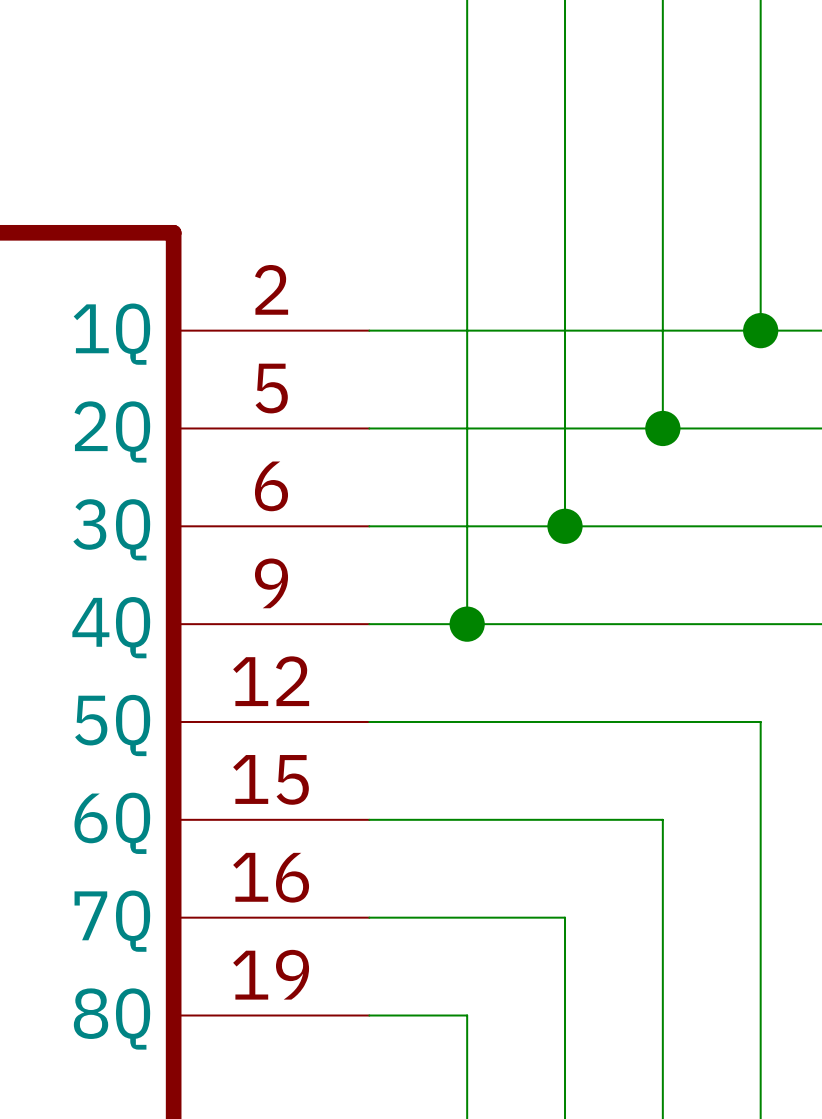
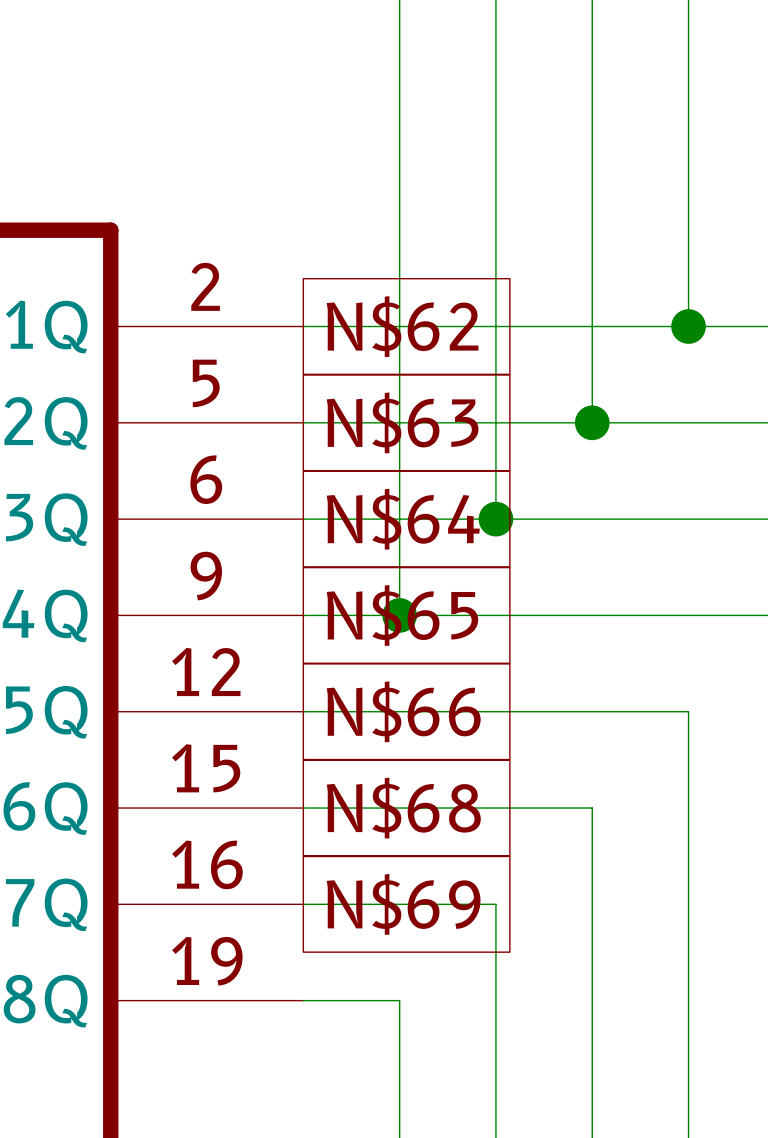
global label: none -> N$62 (402, 326)
global label: none -> N$63 (402, 422)
global label: none -> N$64 (403, 519)
global label: none -> N$65 (402, 615)
global label: none -> N$66 (403, 711)
global label: none -> N$68 (403, 808)
global label: none -> N$69 (403, 904)

